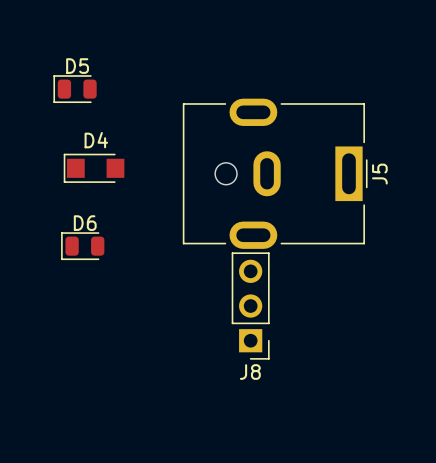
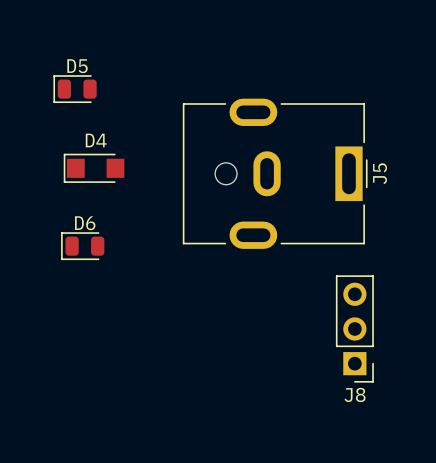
J8 position: (250, 306) -> (354, 328)

